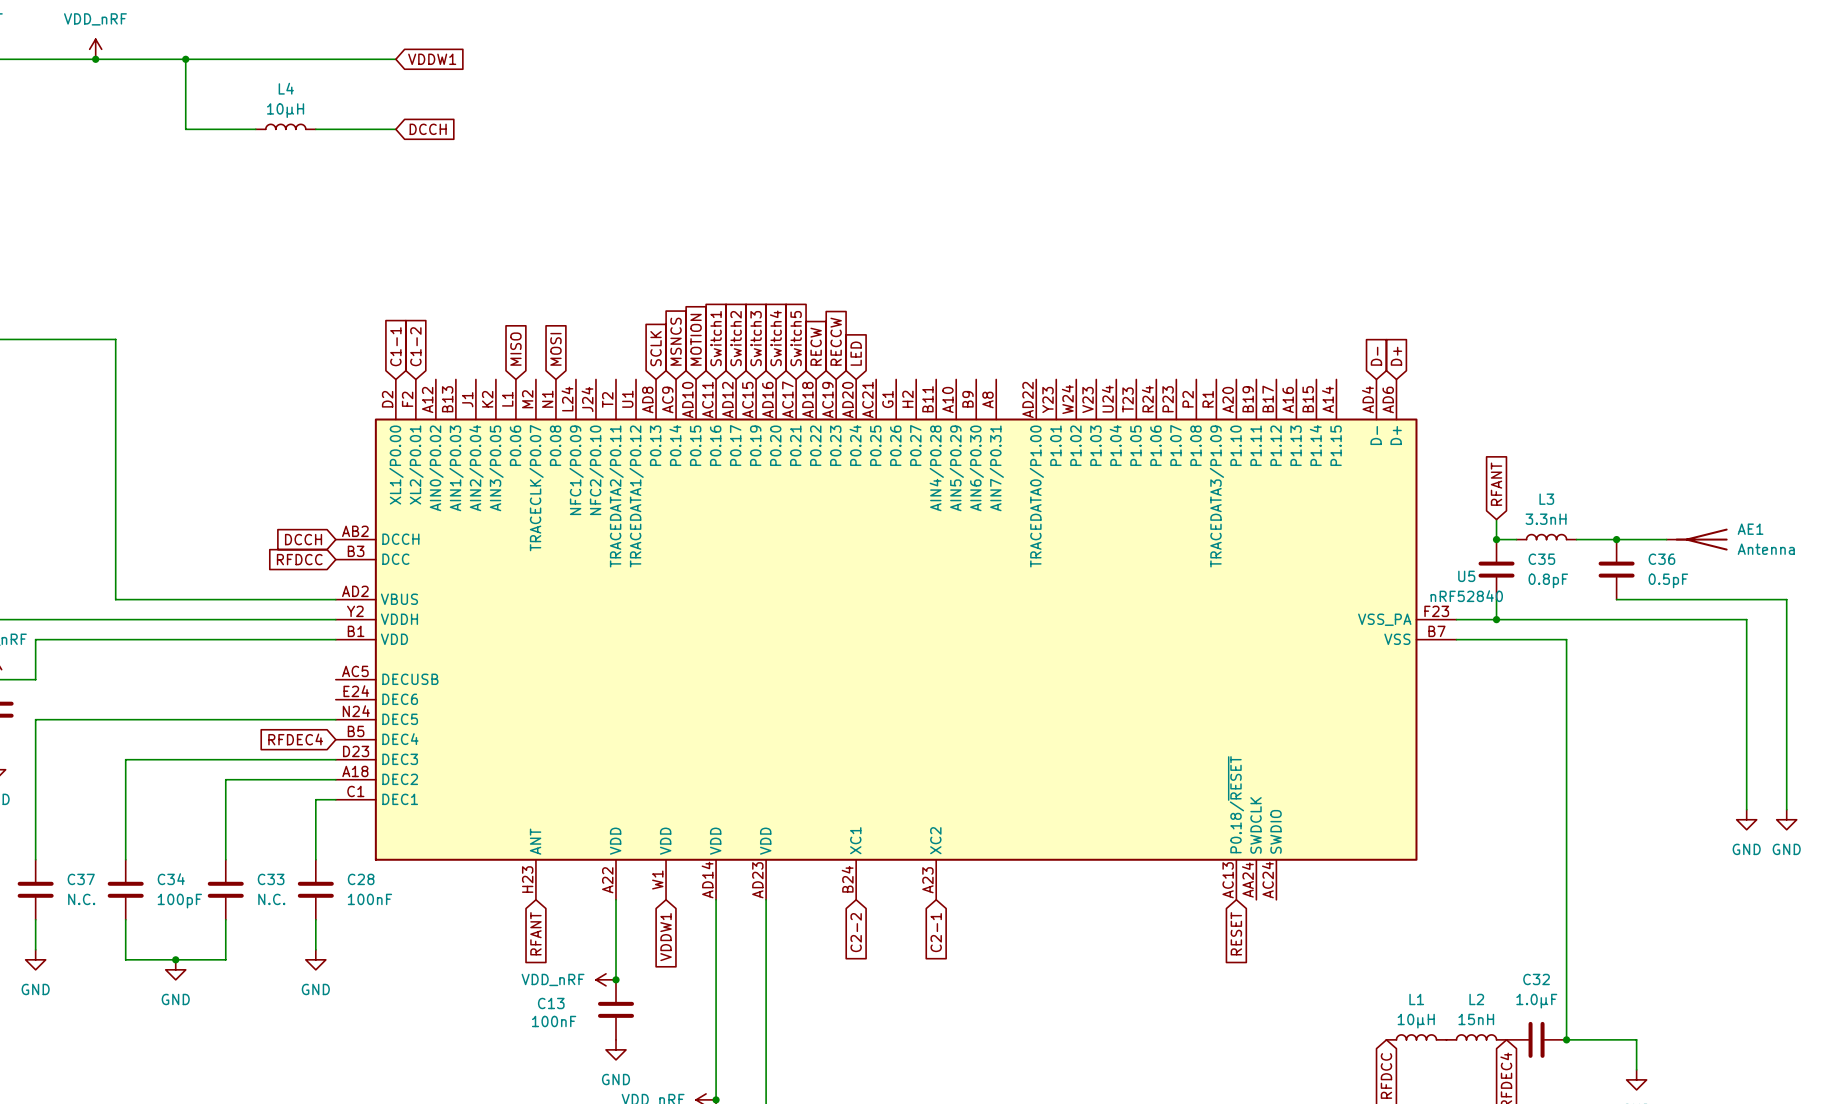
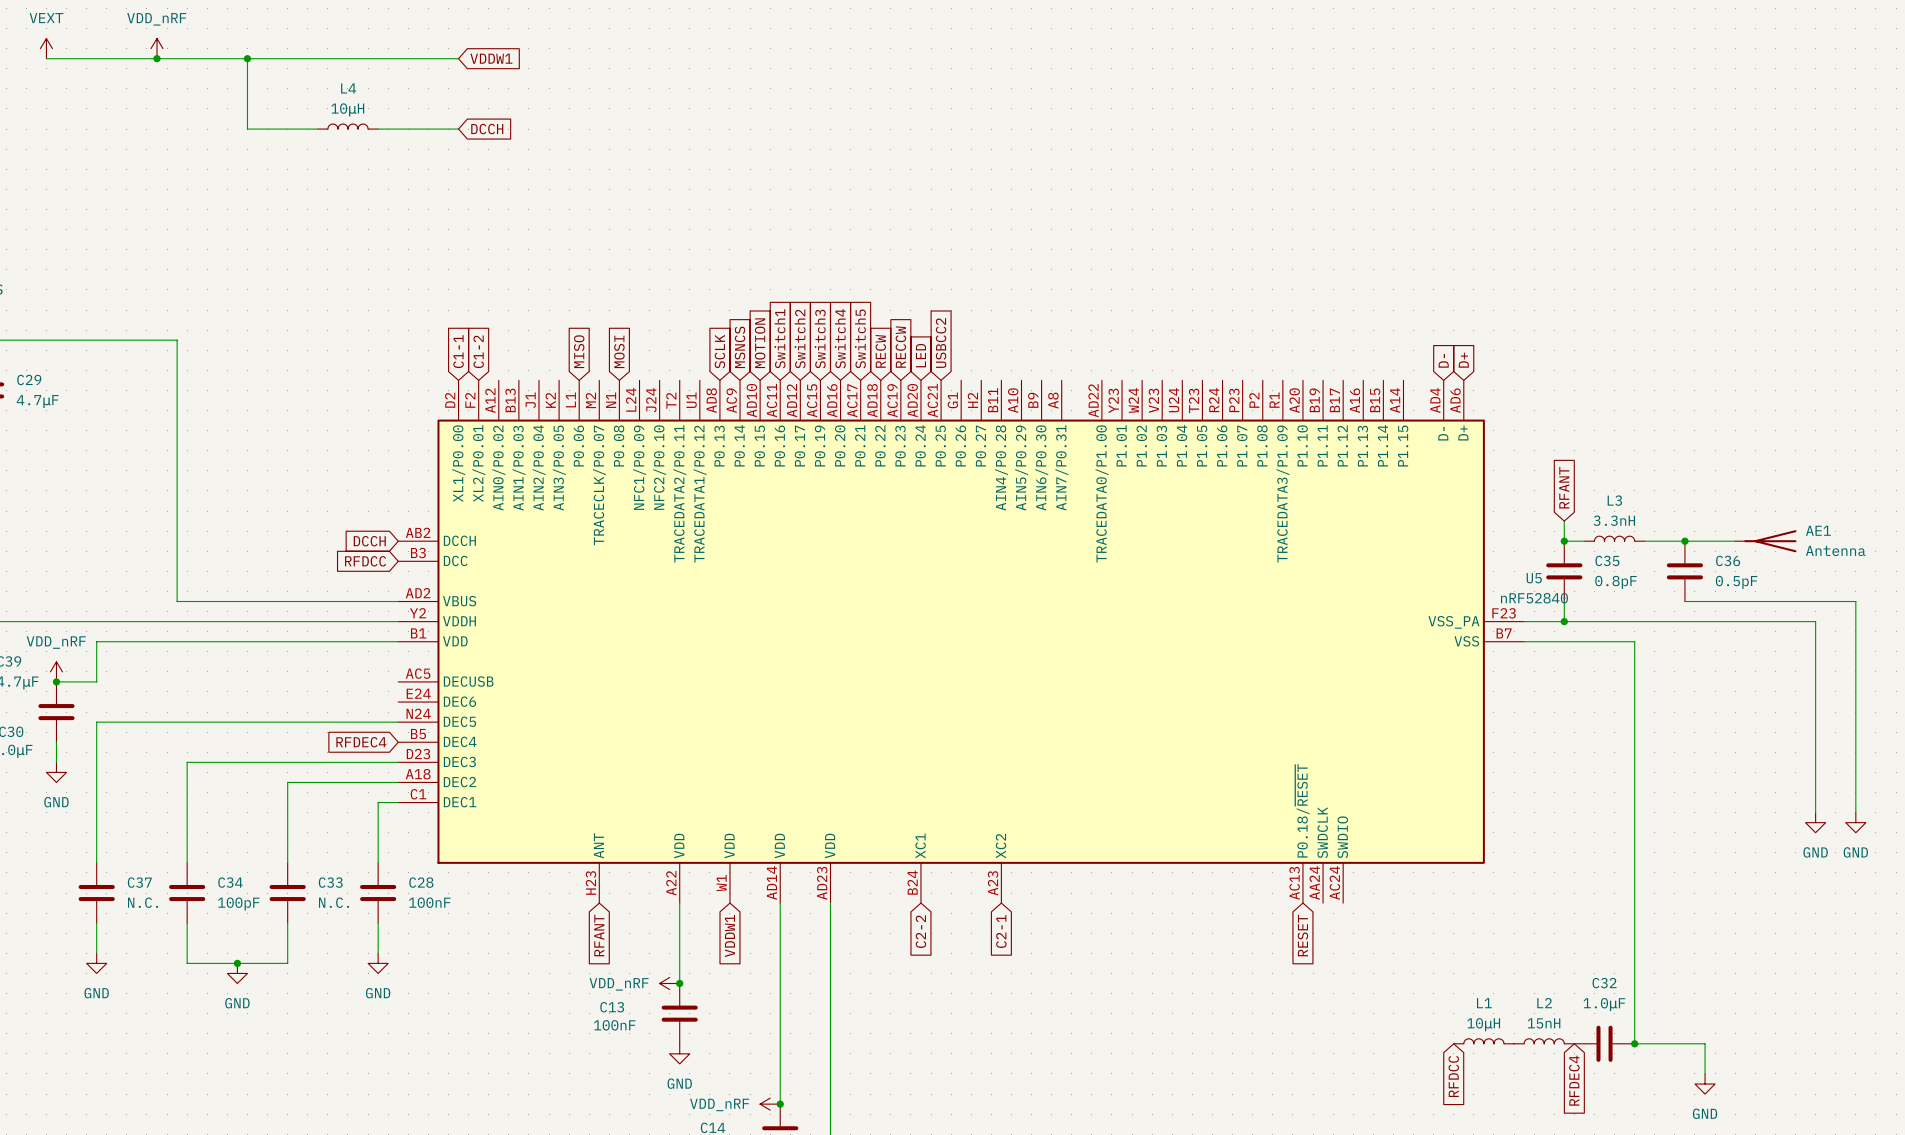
global label: none -> USBCC2 (941, 343)

